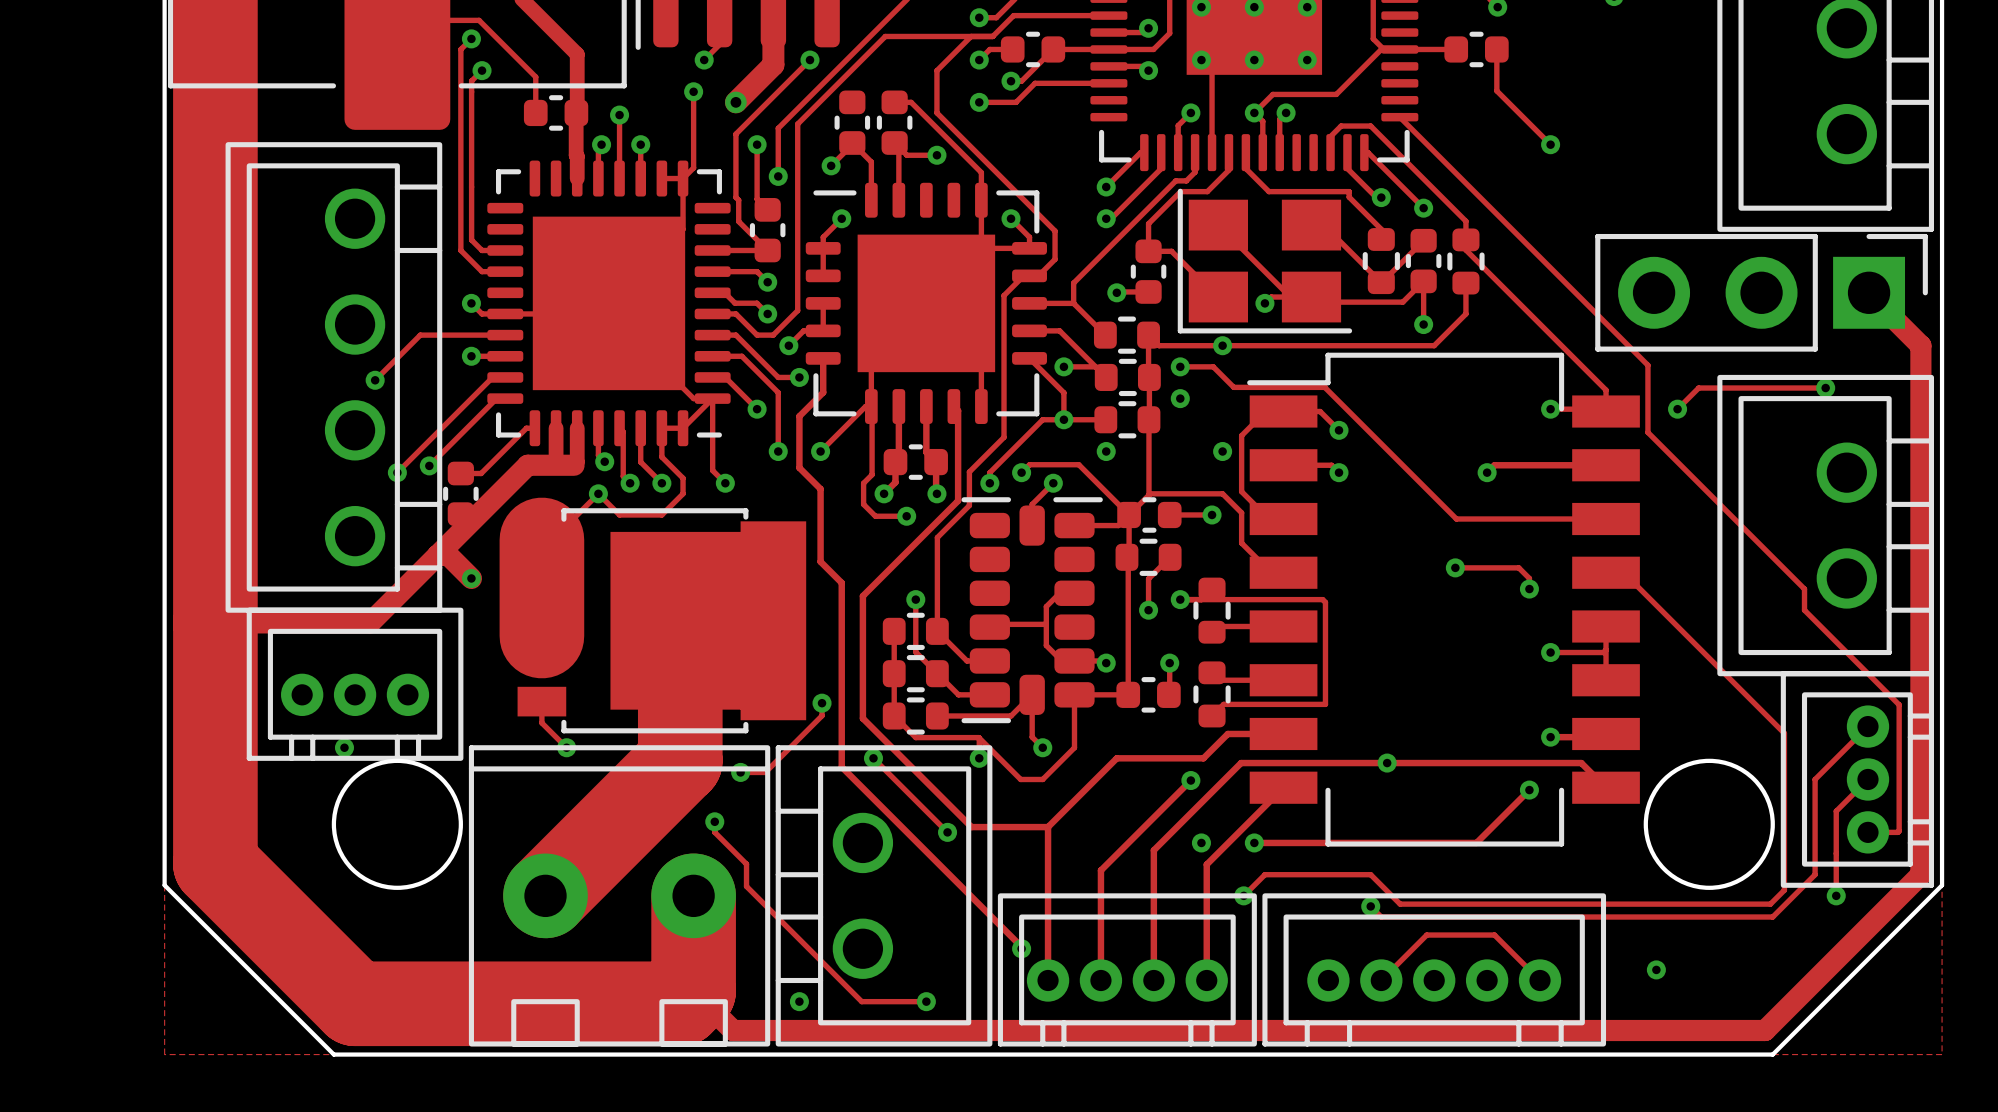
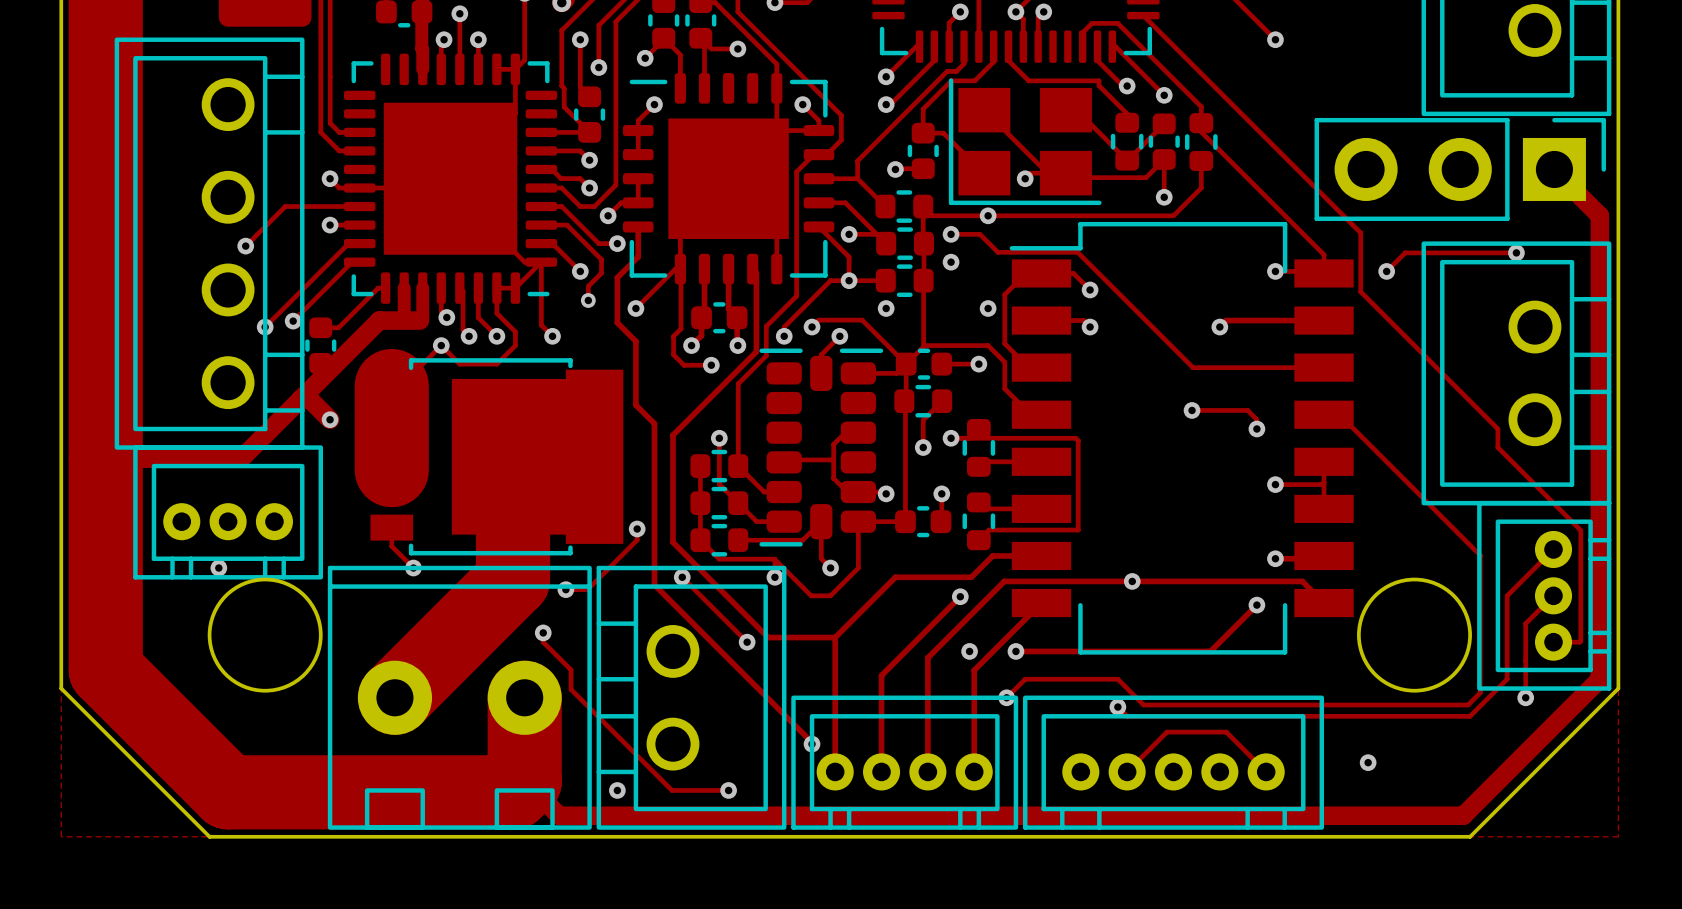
track: (778, 392) (778, 451) -> (598, 256) (601, 259) (601, 273) (588, 286) (588, 300)
via position: (778, 451) -> (588, 300)

